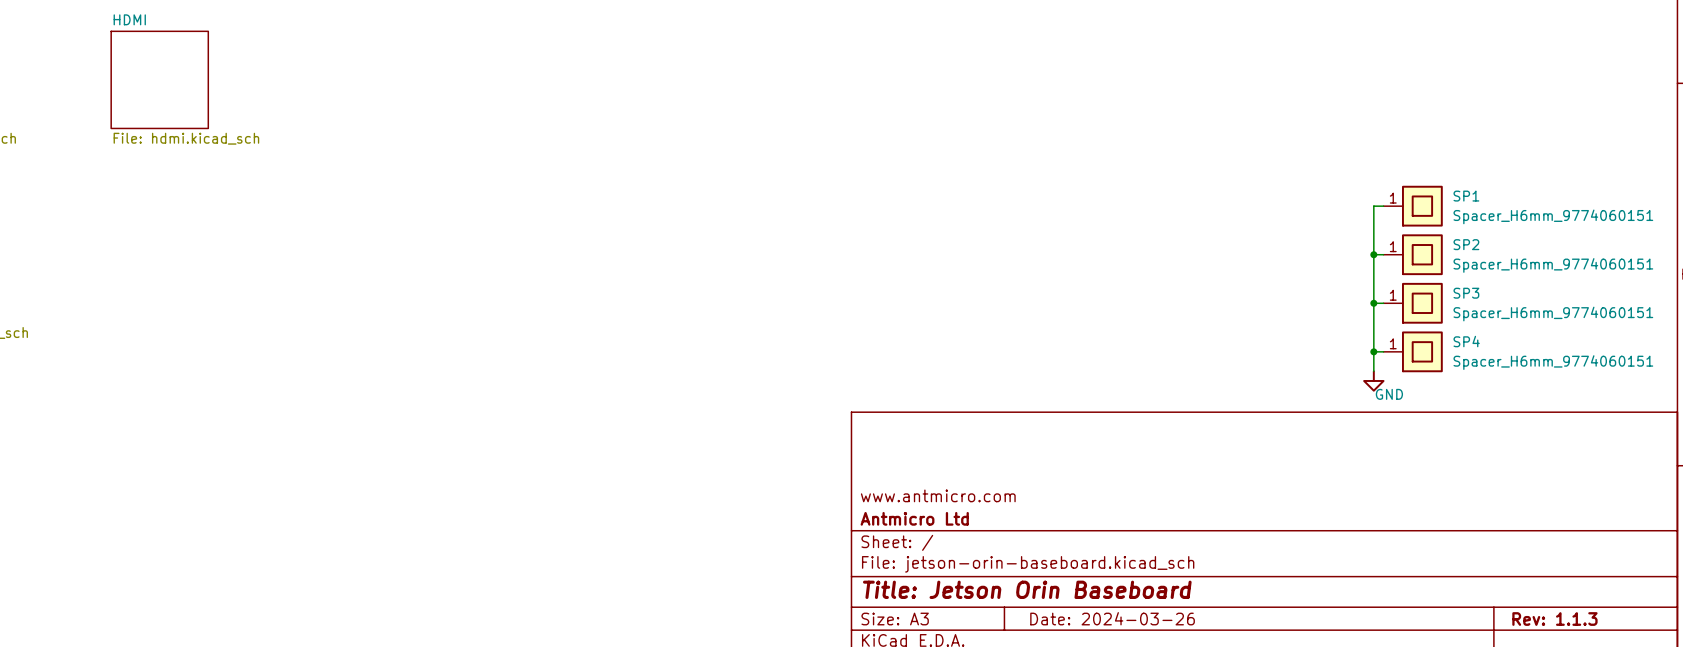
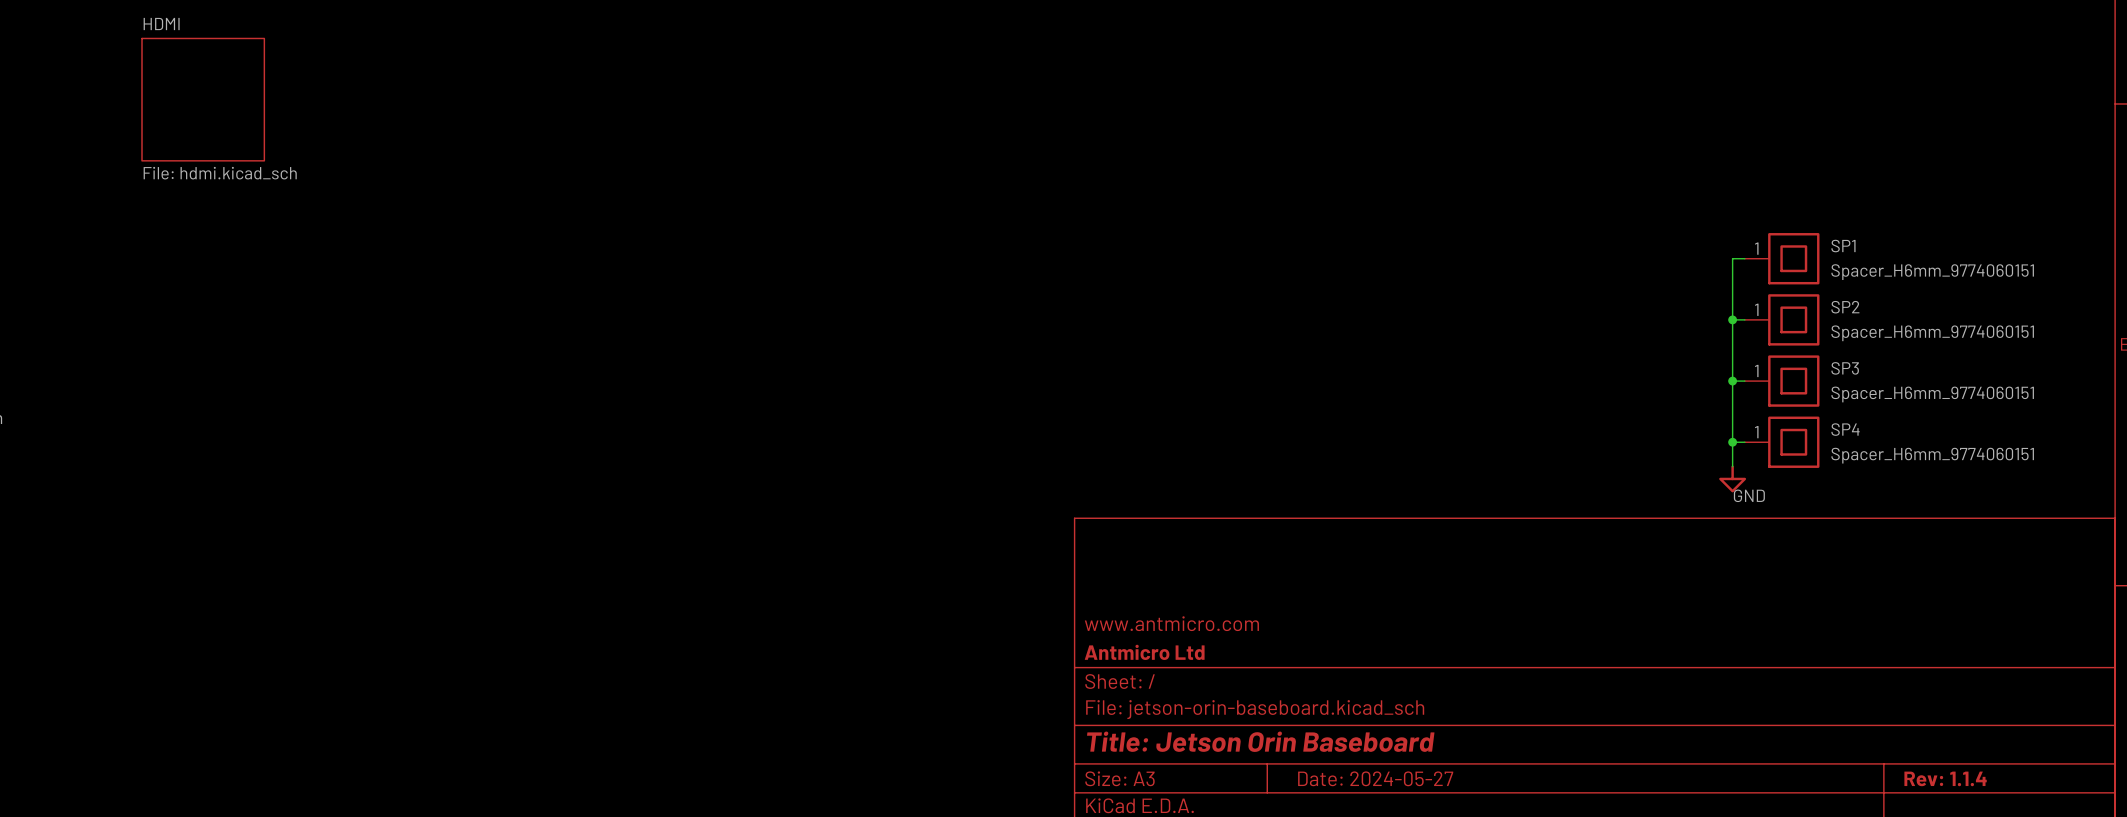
title block: Date: 2024-03-26 (1112, 618) -> Date: 2024-05-27 (1375, 778)
title block: Rev: 1.1.3 (1554, 619) -> Rev: 1.1.4 (1945, 778)

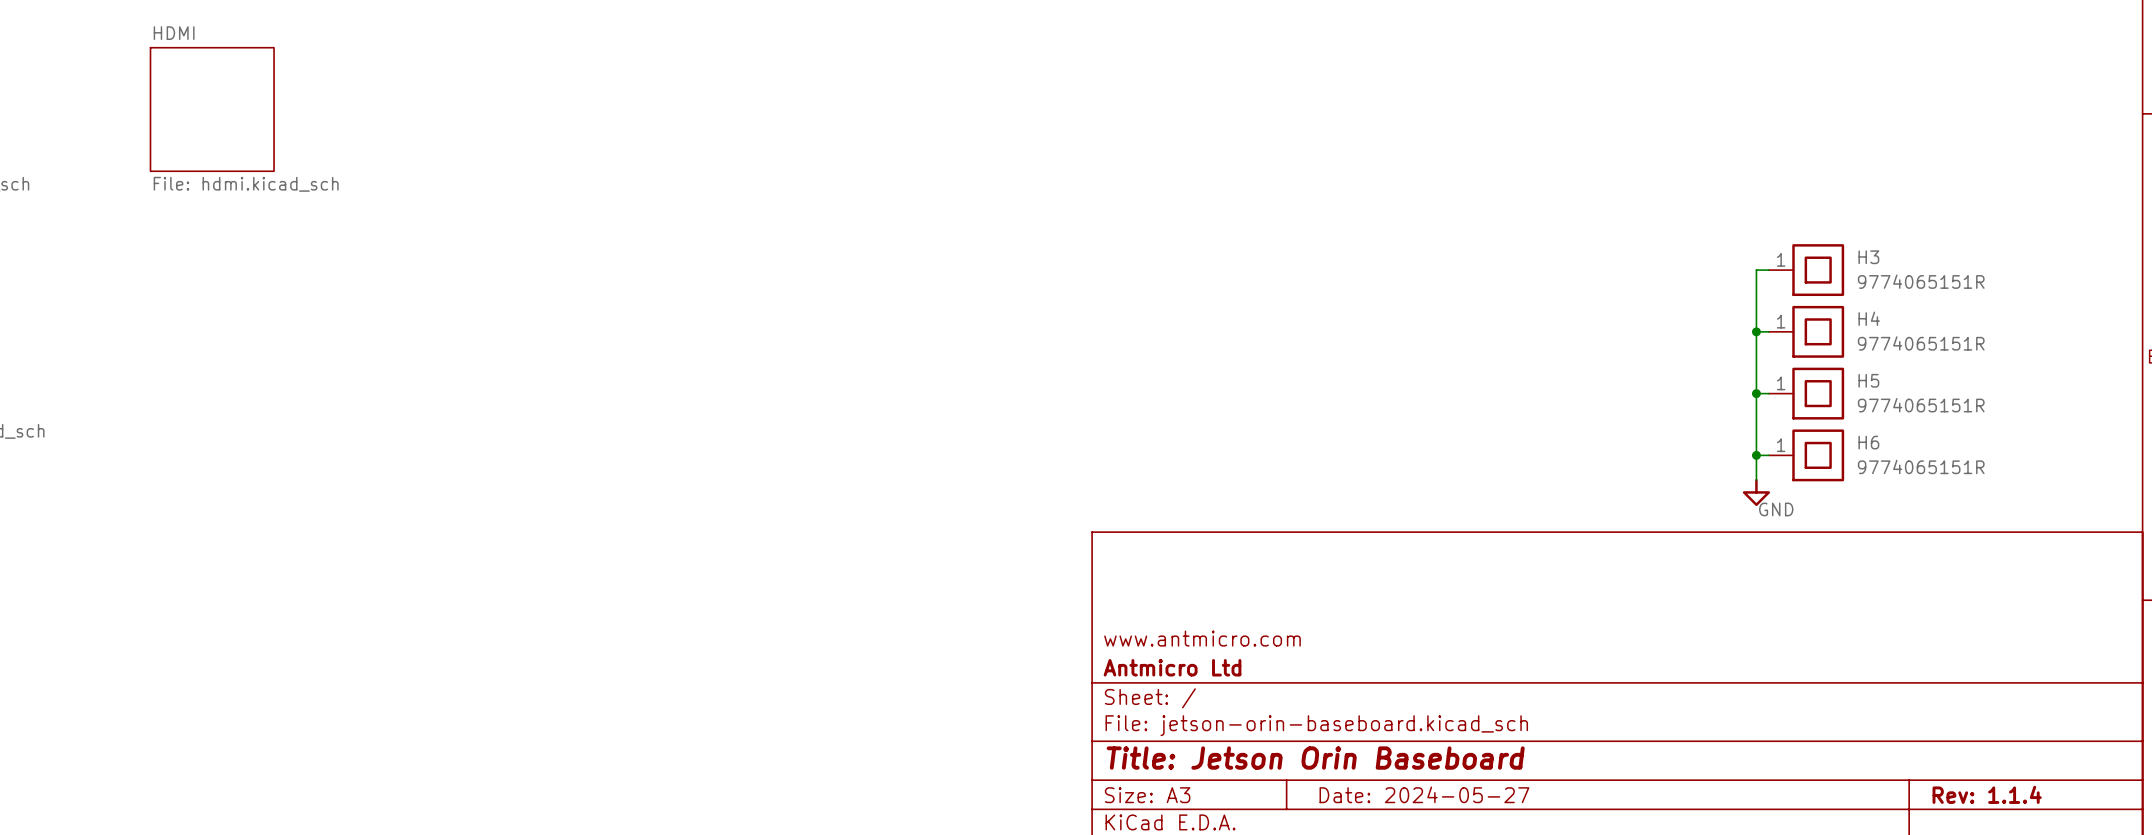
SP1 name: SP1 (1843, 246) -> H3 (1868, 257)
SP1 text: none -> 9774065151R (1921, 281)
SP1 value: Spacer_H6mm_9774060151 (1932, 272) -> none
SP2 name: SP2 (1845, 307) -> H4 (1869, 318)
SP2 text: none -> 9774065151R (1921, 343)
SP2 value: Spacer_H6mm_9774060151 (1932, 333) -> none
SP3 name: SP3 (1845, 368) -> H5 (1868, 380)
SP3 text: none -> 9774065151R (1921, 405)
SP3 value: Spacer_H6mm_9774060151 (1932, 394) -> none
SP4 name: SP4 (1845, 429) -> H6 (1868, 442)
SP4 text: none -> 9774065151R (1921, 466)
SP4 value: Spacer_H6mm_9774060151 (1932, 455) -> none

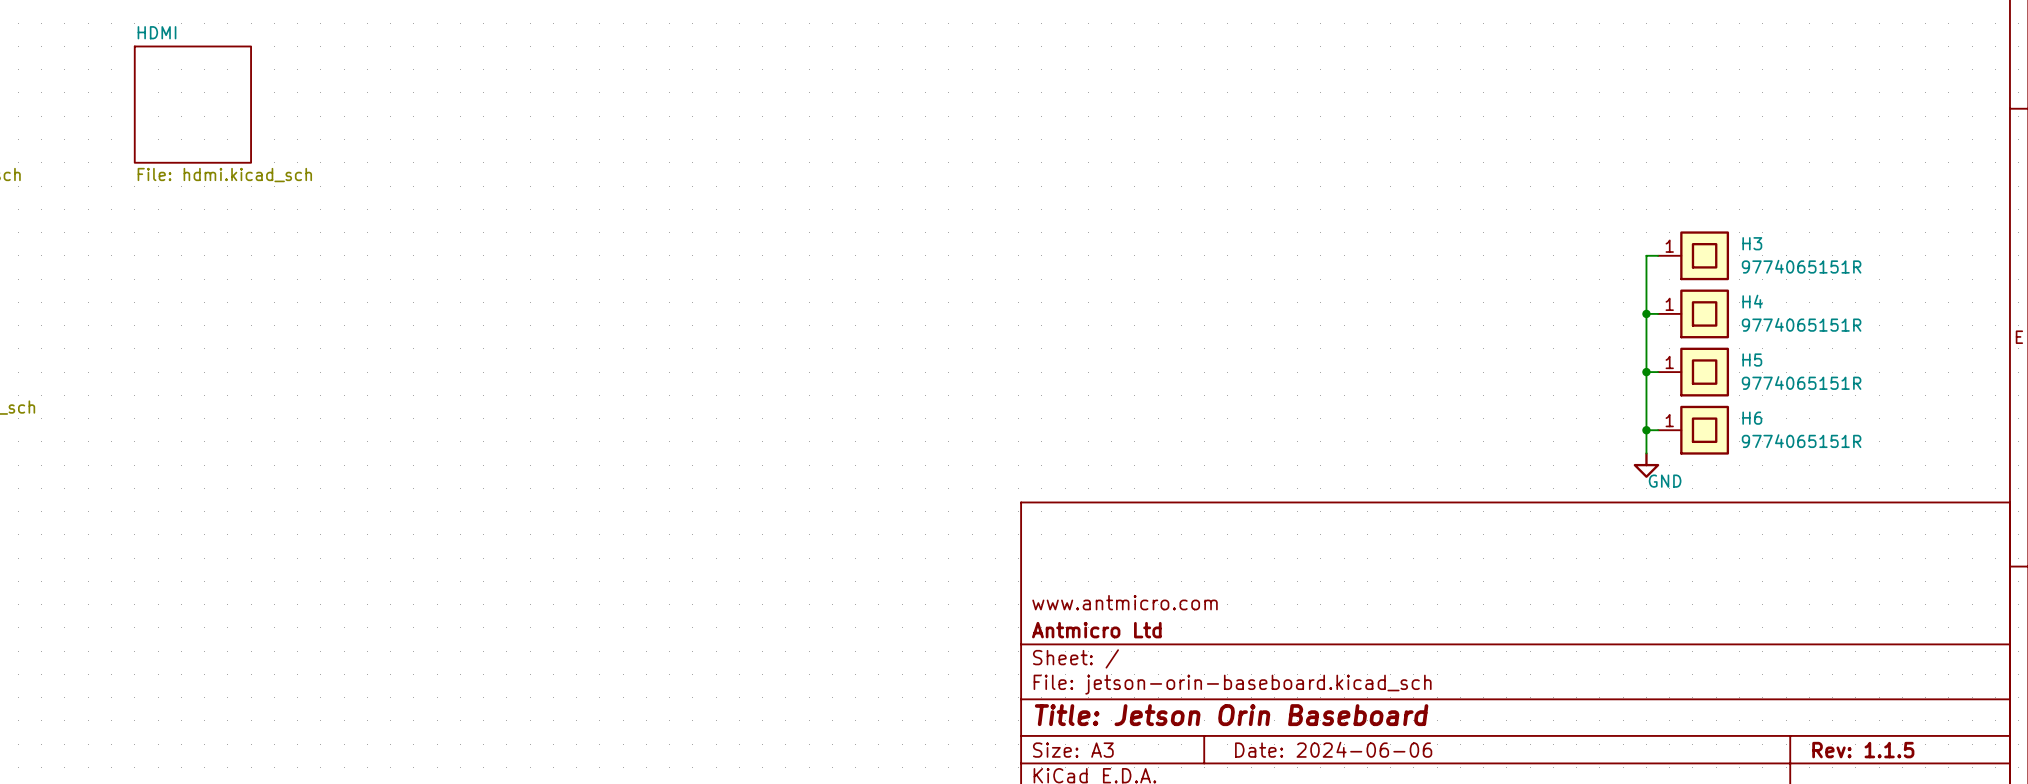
title block: Date: 2024-05-27 (1424, 794) -> Date: 2024-06-06 (1333, 749)
title block: Rev: 1.1.4 (1987, 794) -> Rev: 1.1.5 (1863, 750)

